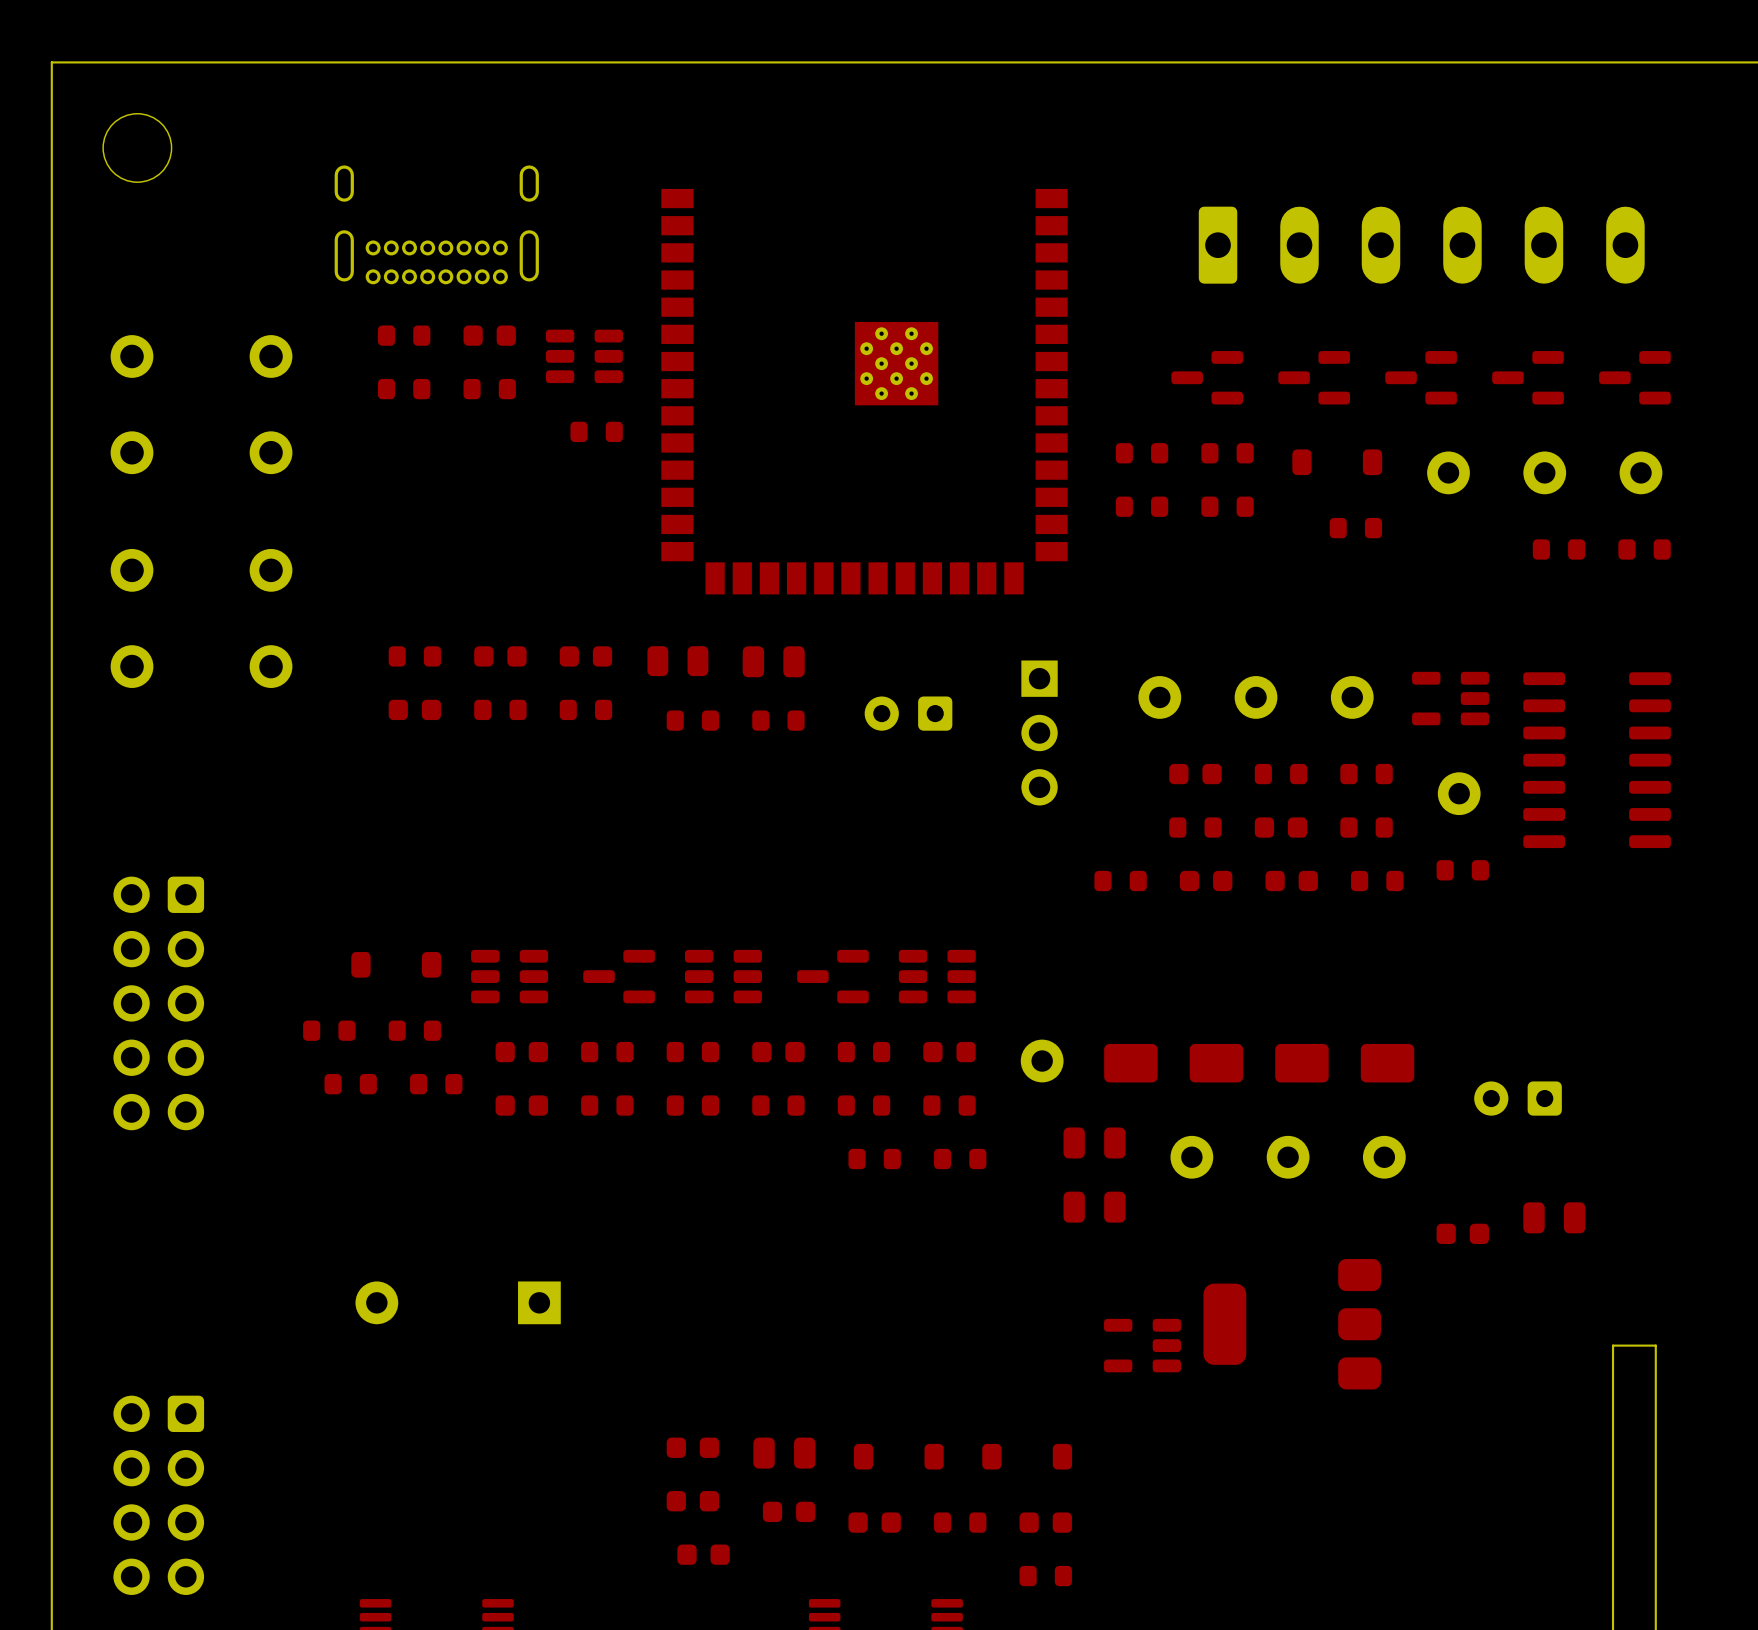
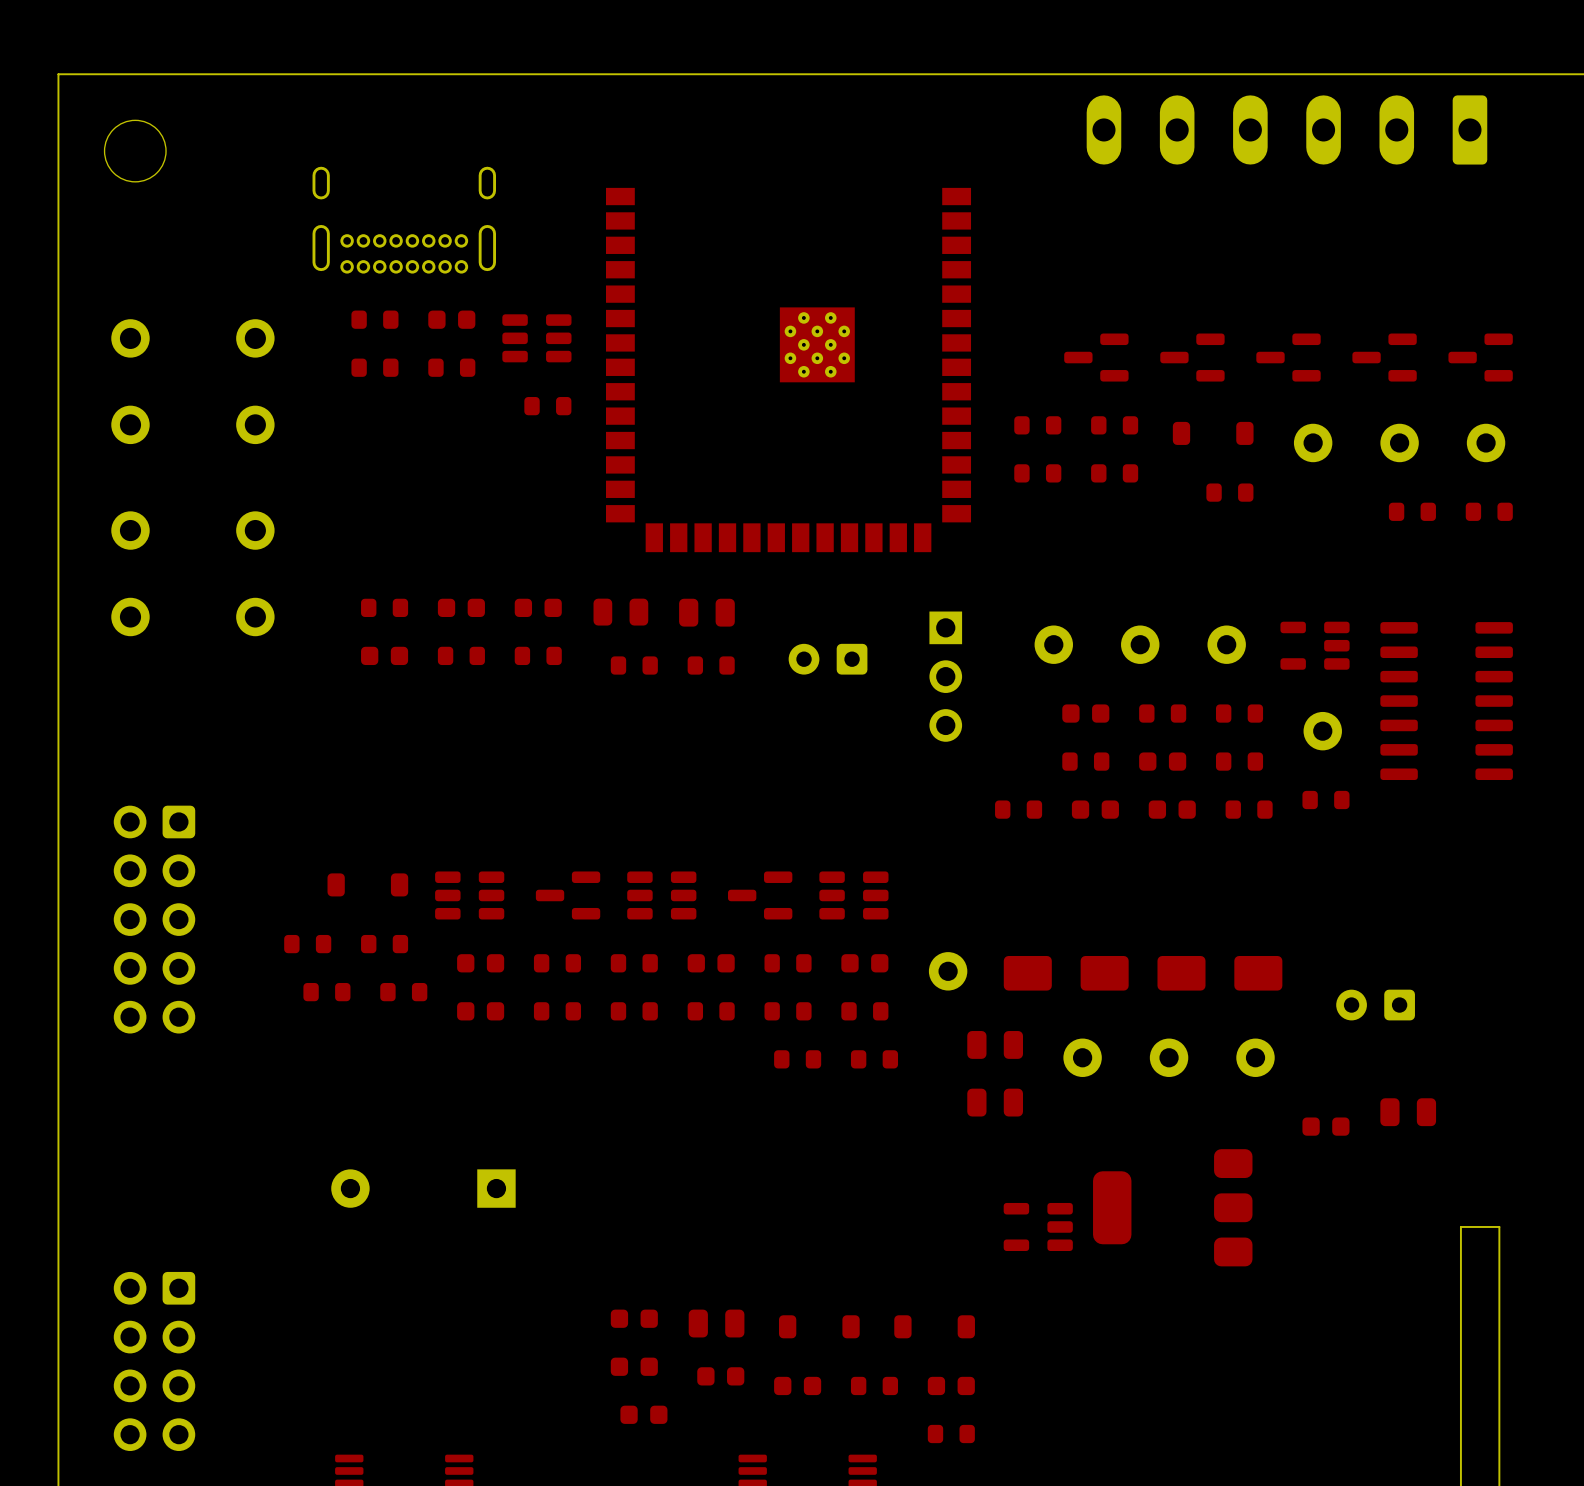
part rotation: 0° (1421, 245) -> 180° (1286, 129)

